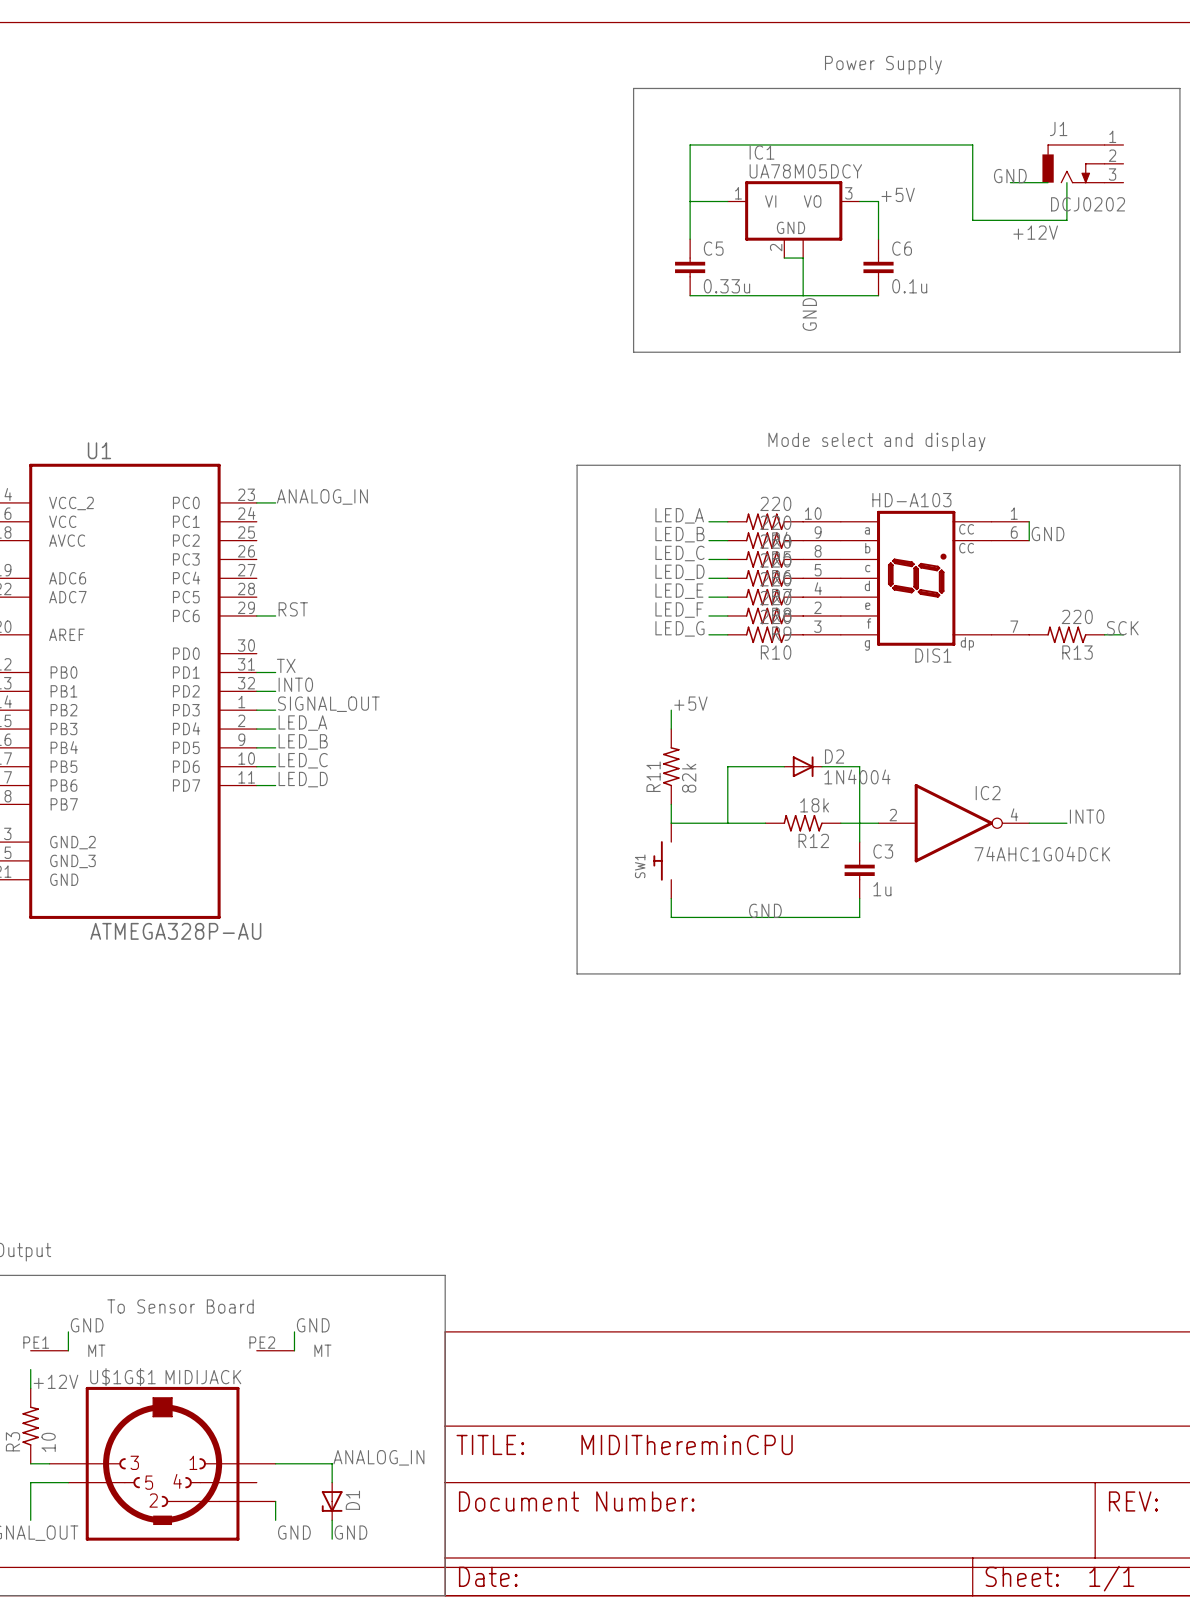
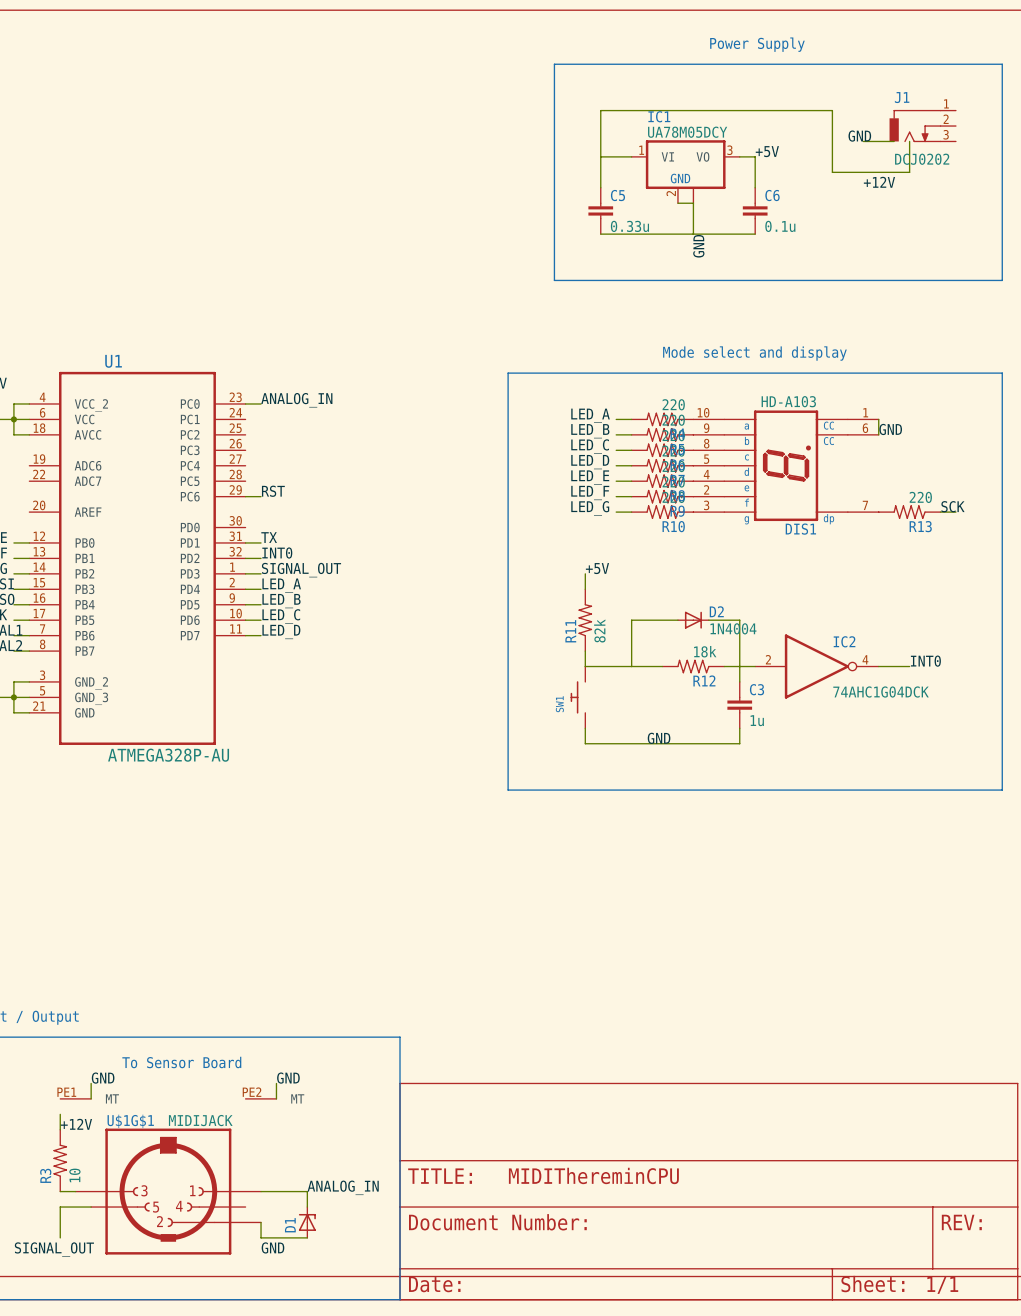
D1 rotation: 0° (332, 1501) -> 180° (307, 1222)
wire: (332, 1520) (332, 1539) -> (307, 1237) (261, 1237)
label: GND (350, 1532) -> none

